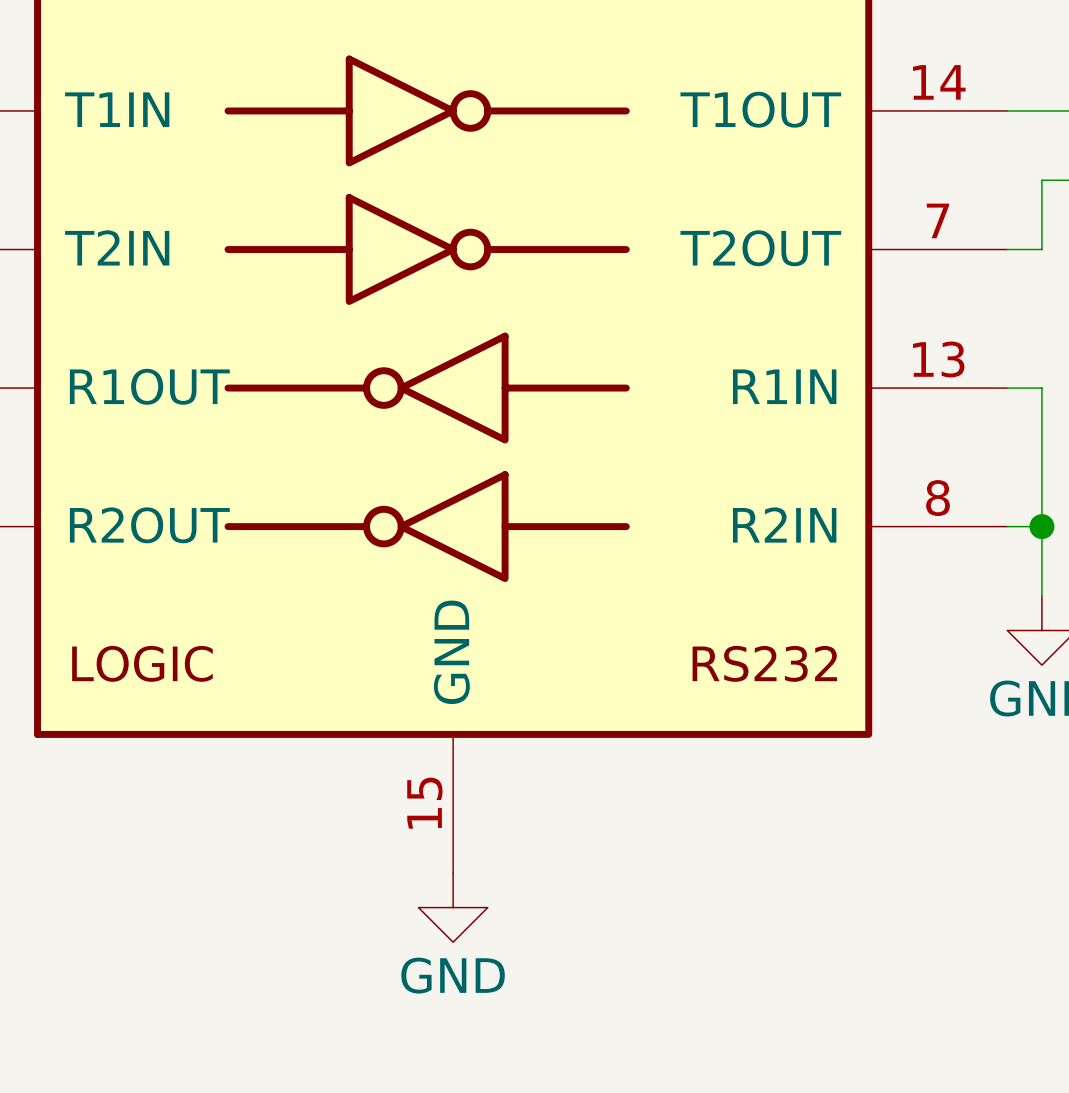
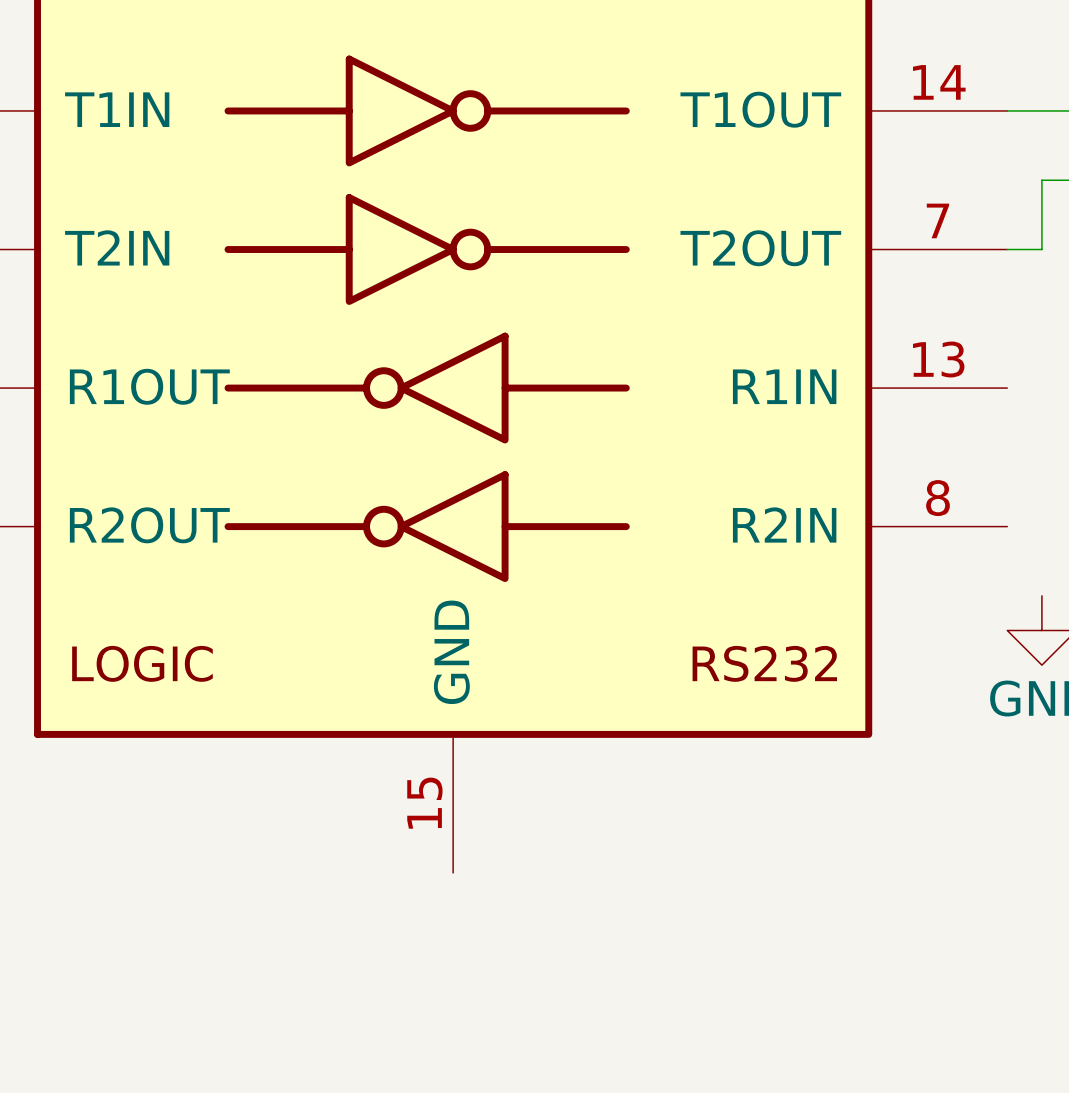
wire: (1007, 388) (1041, 388) (1041, 595) -> none
wire: (1007, 526) (1041, 526) -> none
junction: (1041, 526) -> none
power symbol: GND (453, 907) -> none

